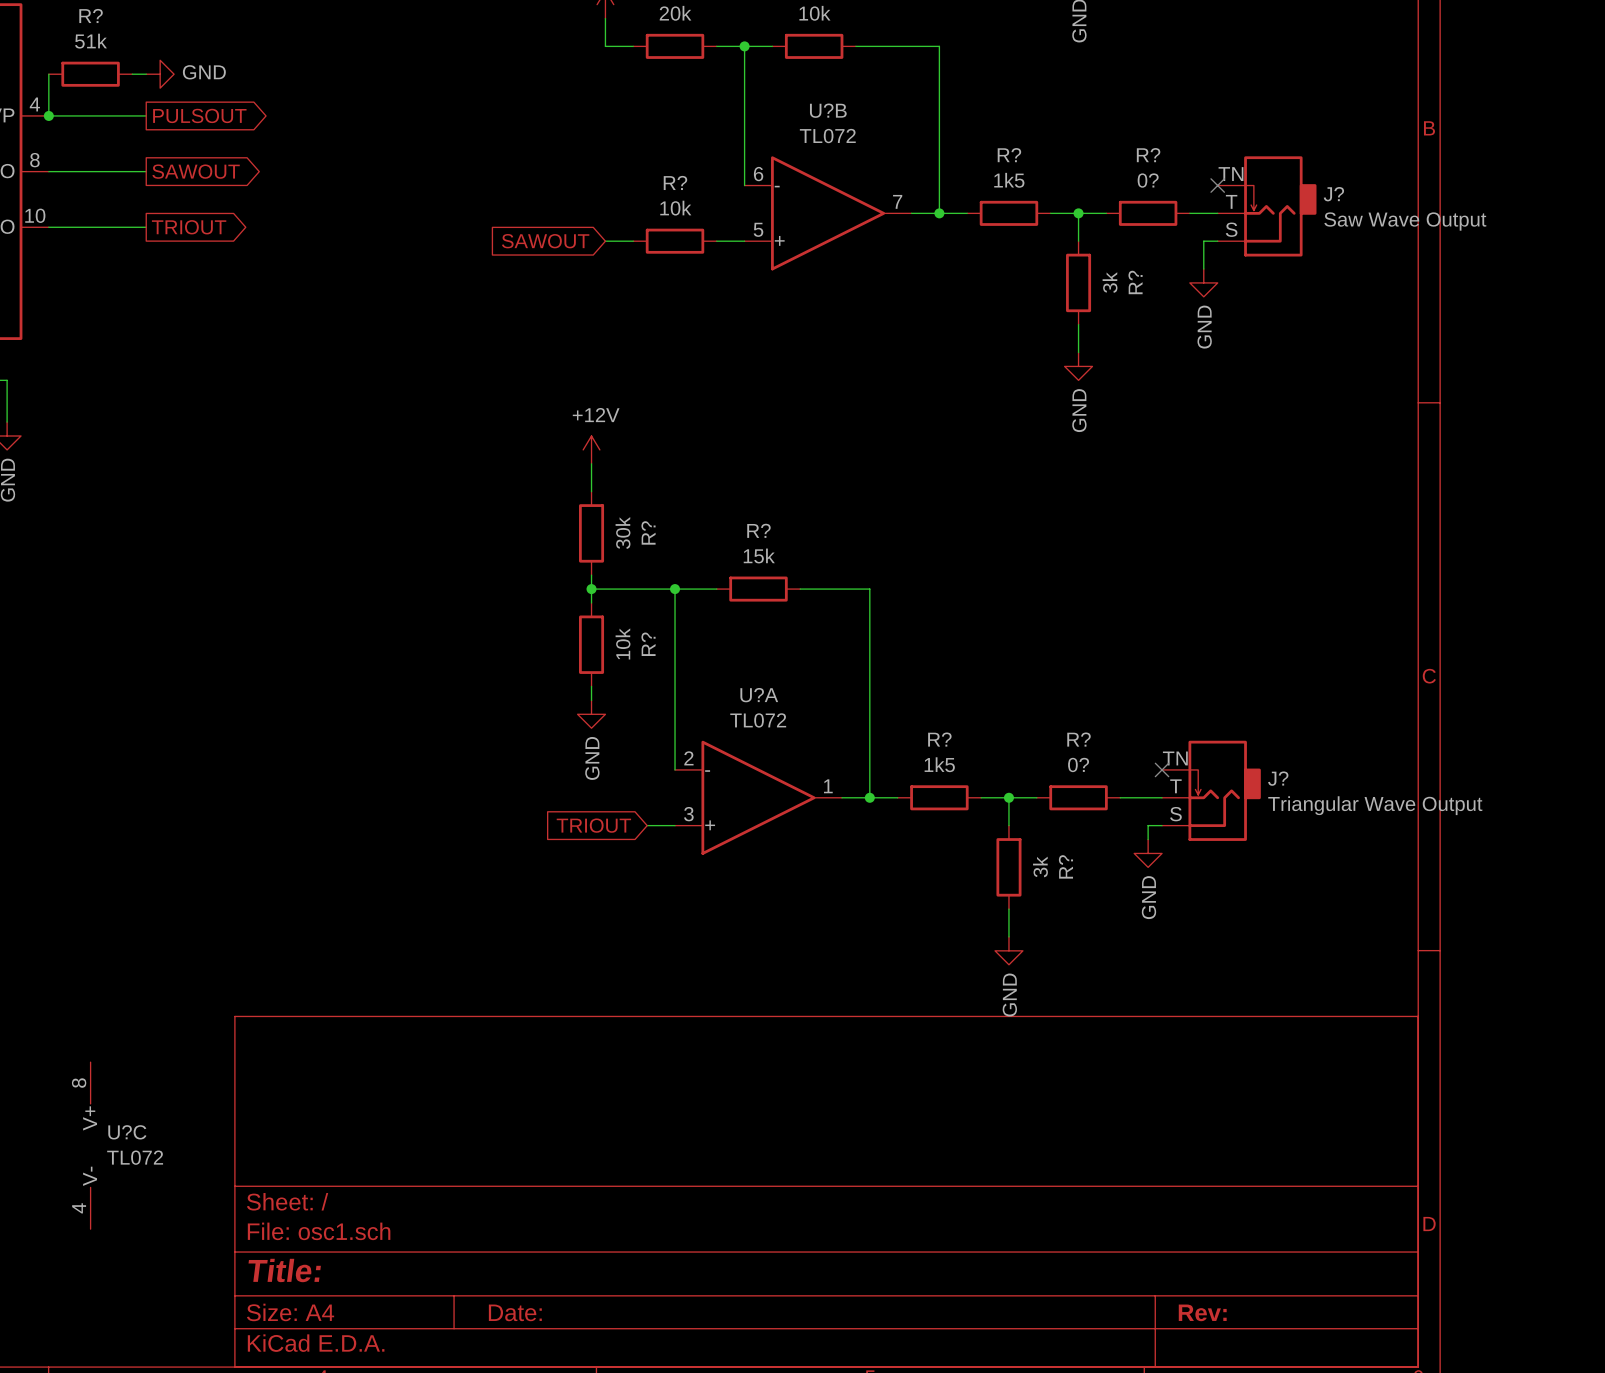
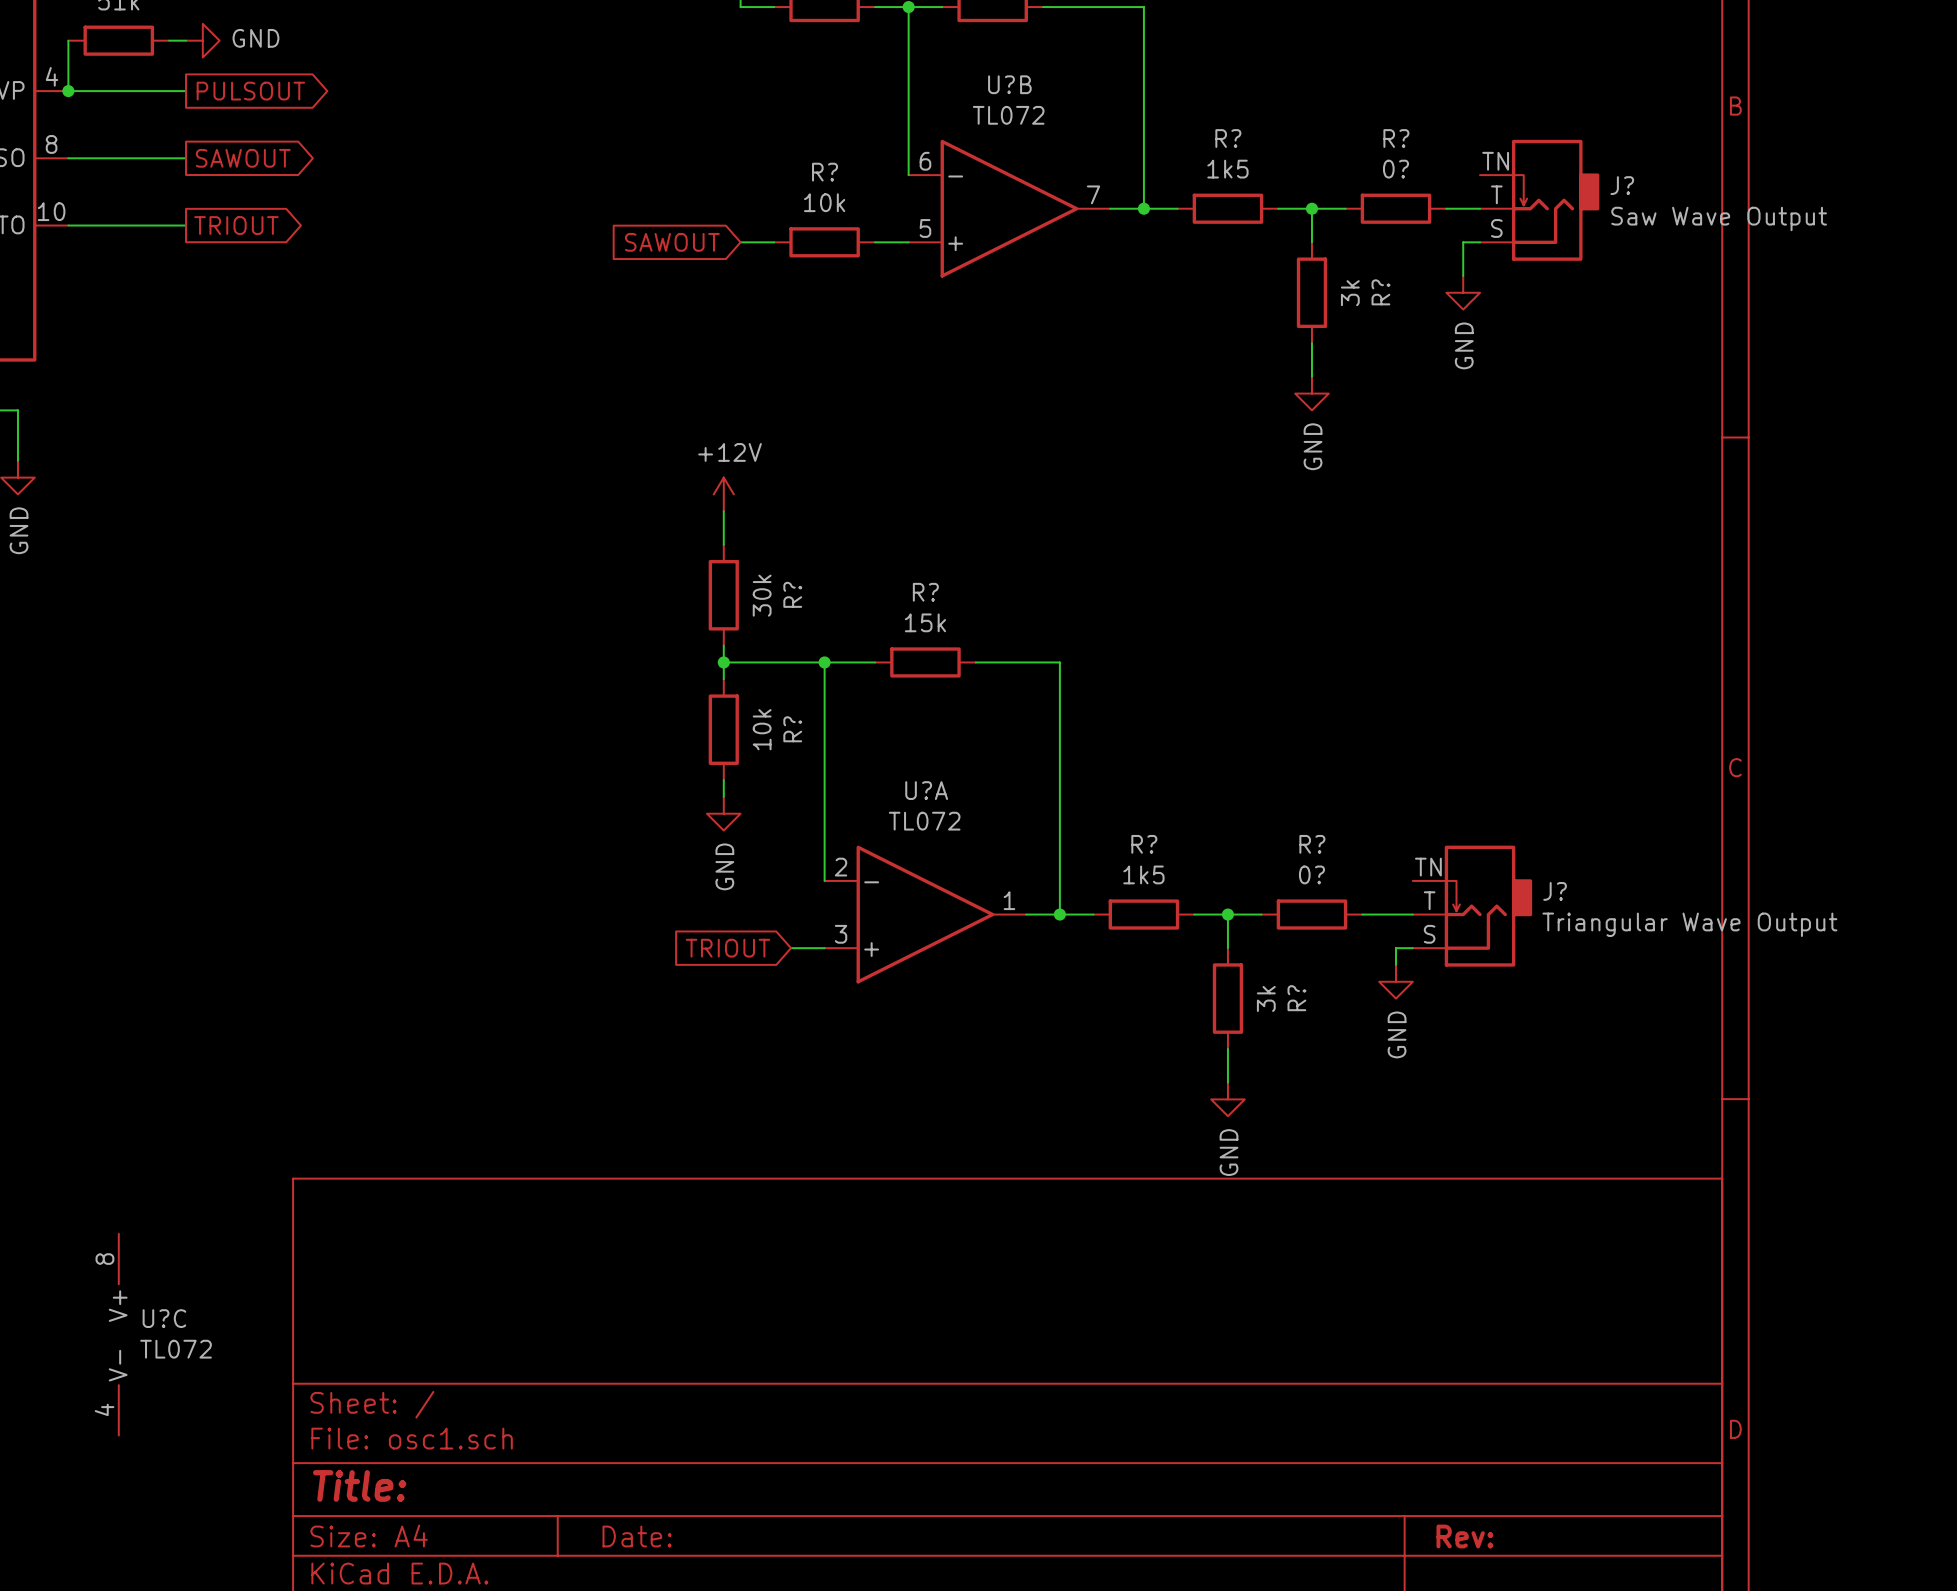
no-connect mark: (1217, 185) -> none
no-connect mark: (1162, 769) -> none

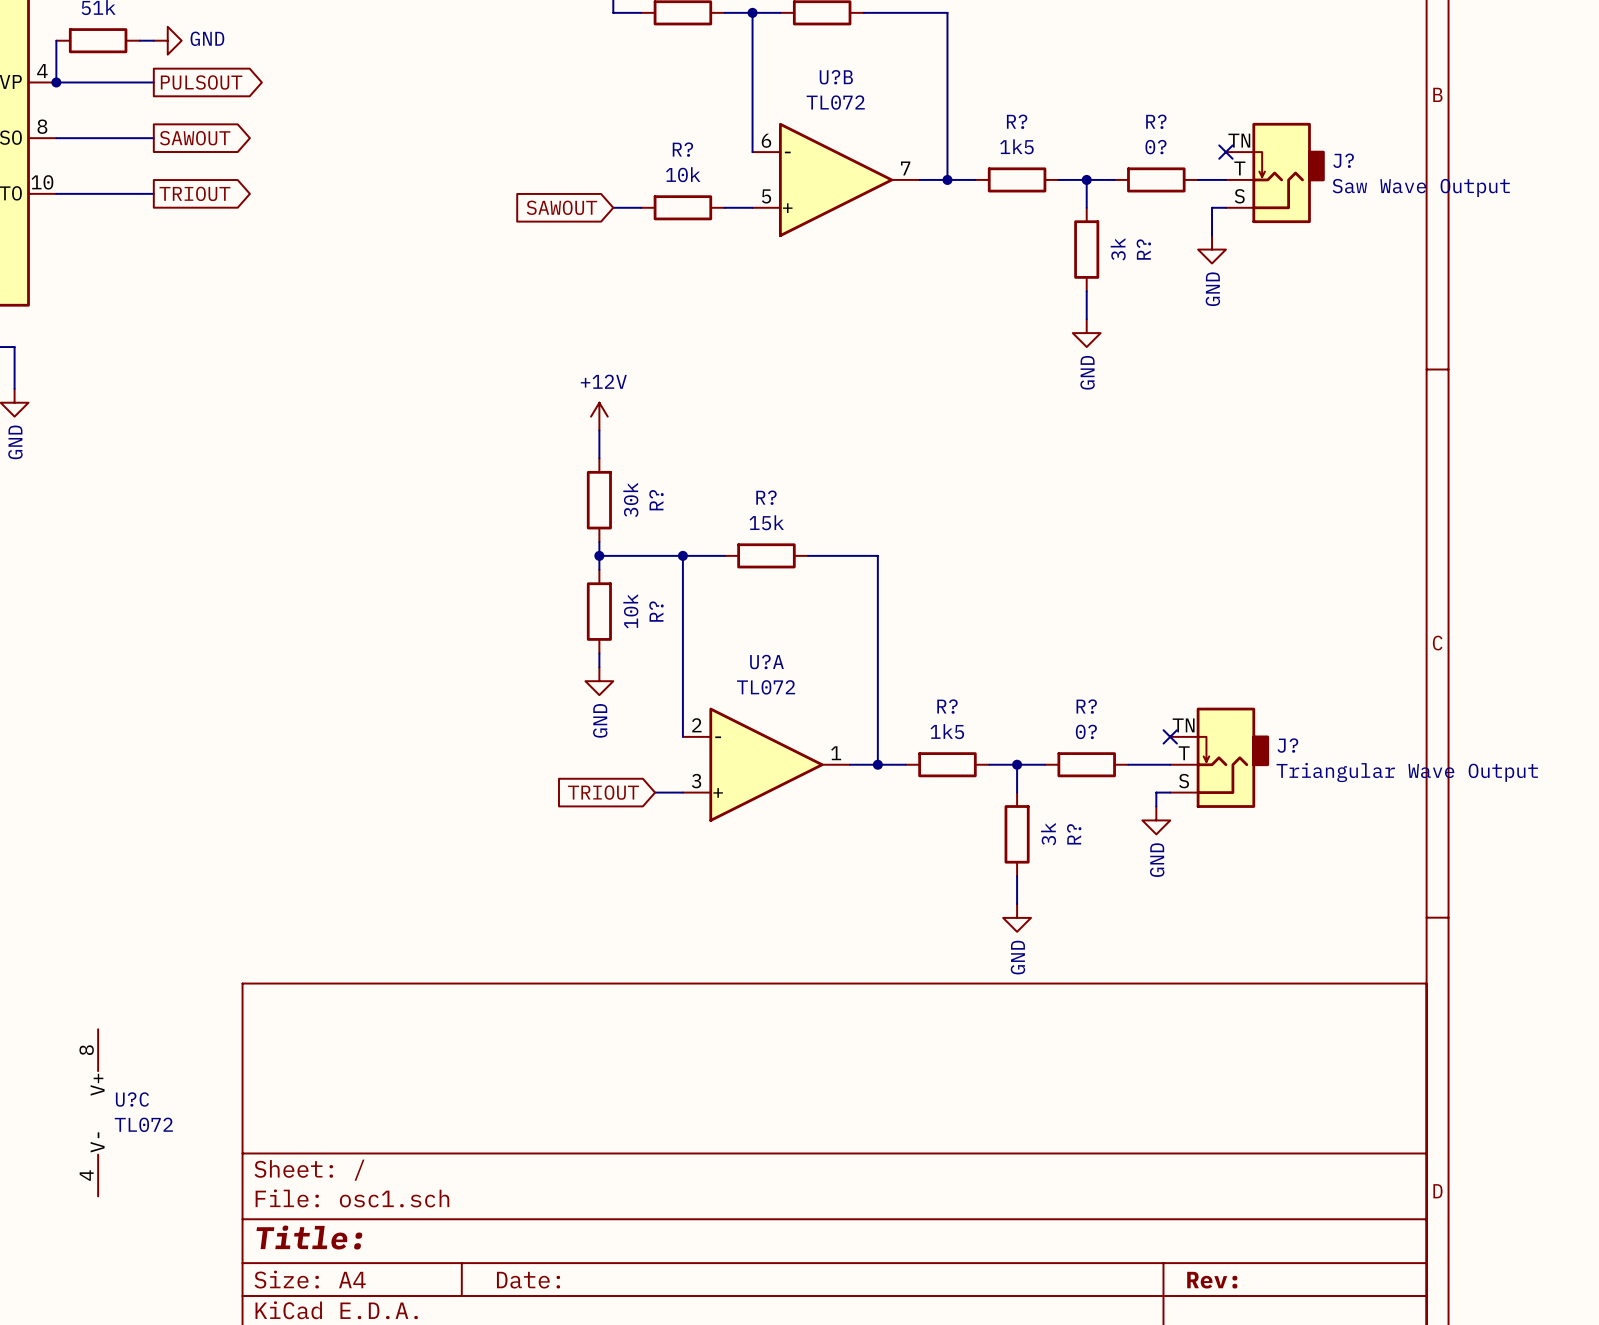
no-connect mark: none -> (1225, 152)
no-connect mark: none -> (1170, 736)

